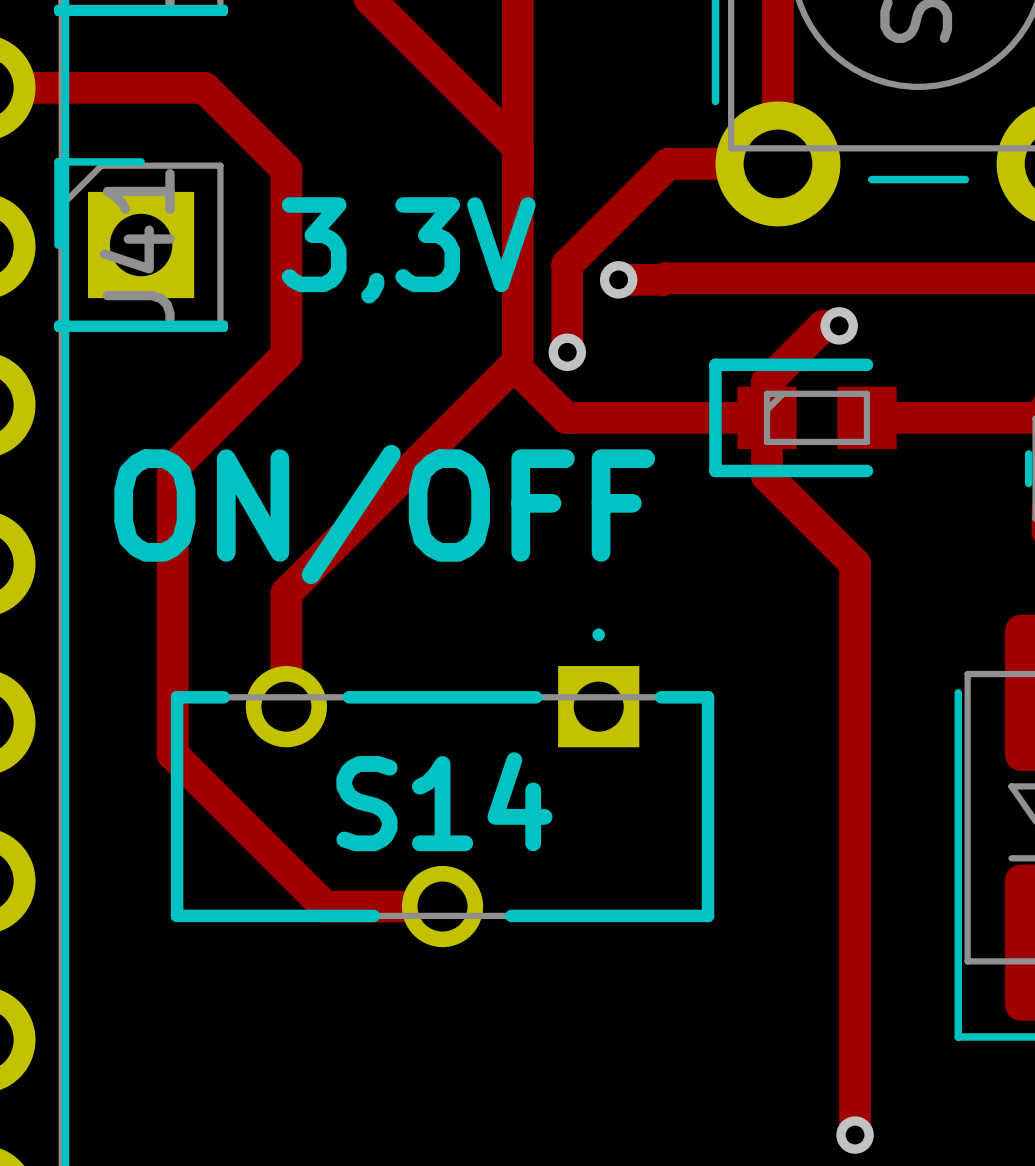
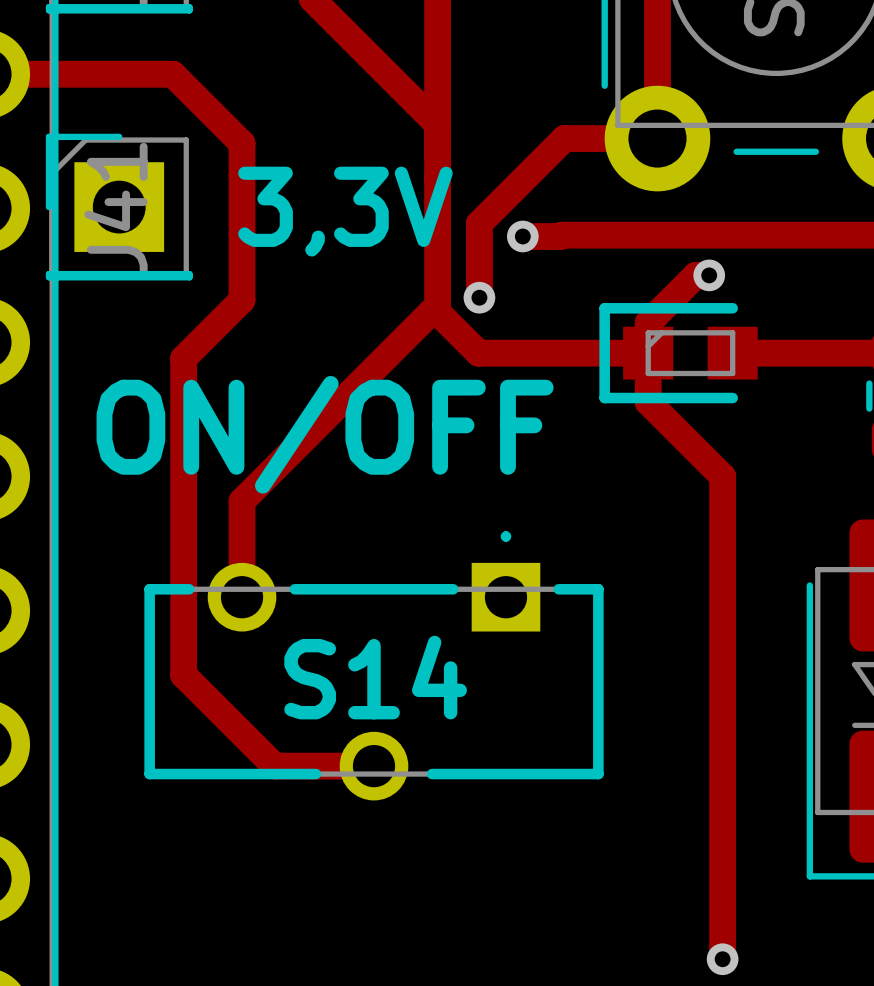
track: (217, 424) (172, 468) (172, 754) (217, 798) -> (183, 358) (183, 675)

